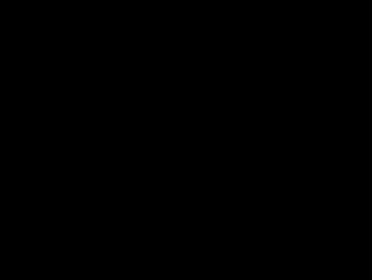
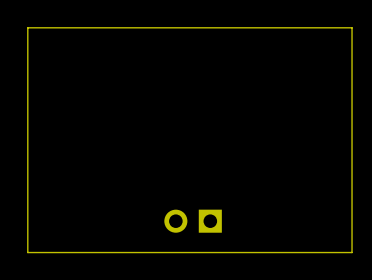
board edge: none -> (352, 27) (27, 27) (27, 252) (352, 252) (352, 27)
part: none -> (193, 221)

